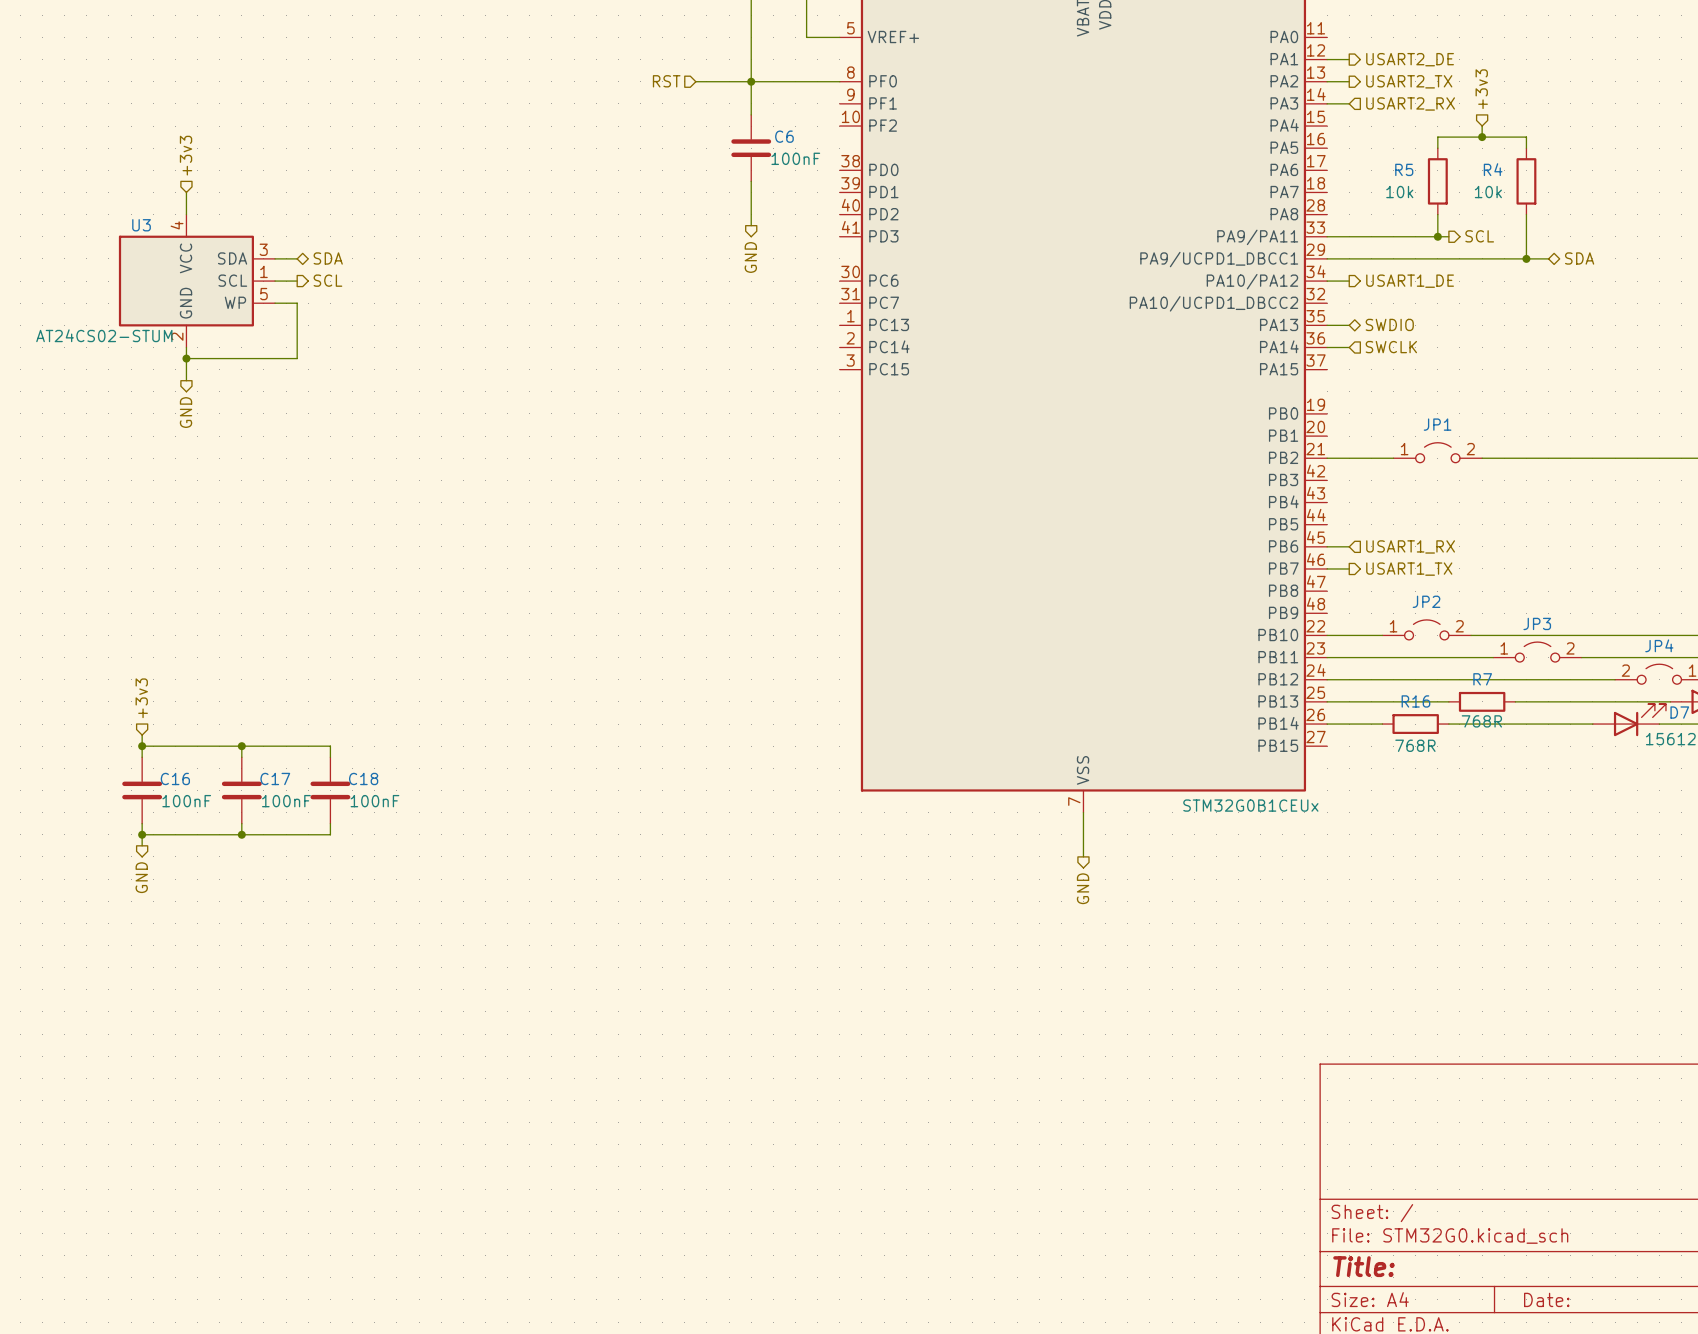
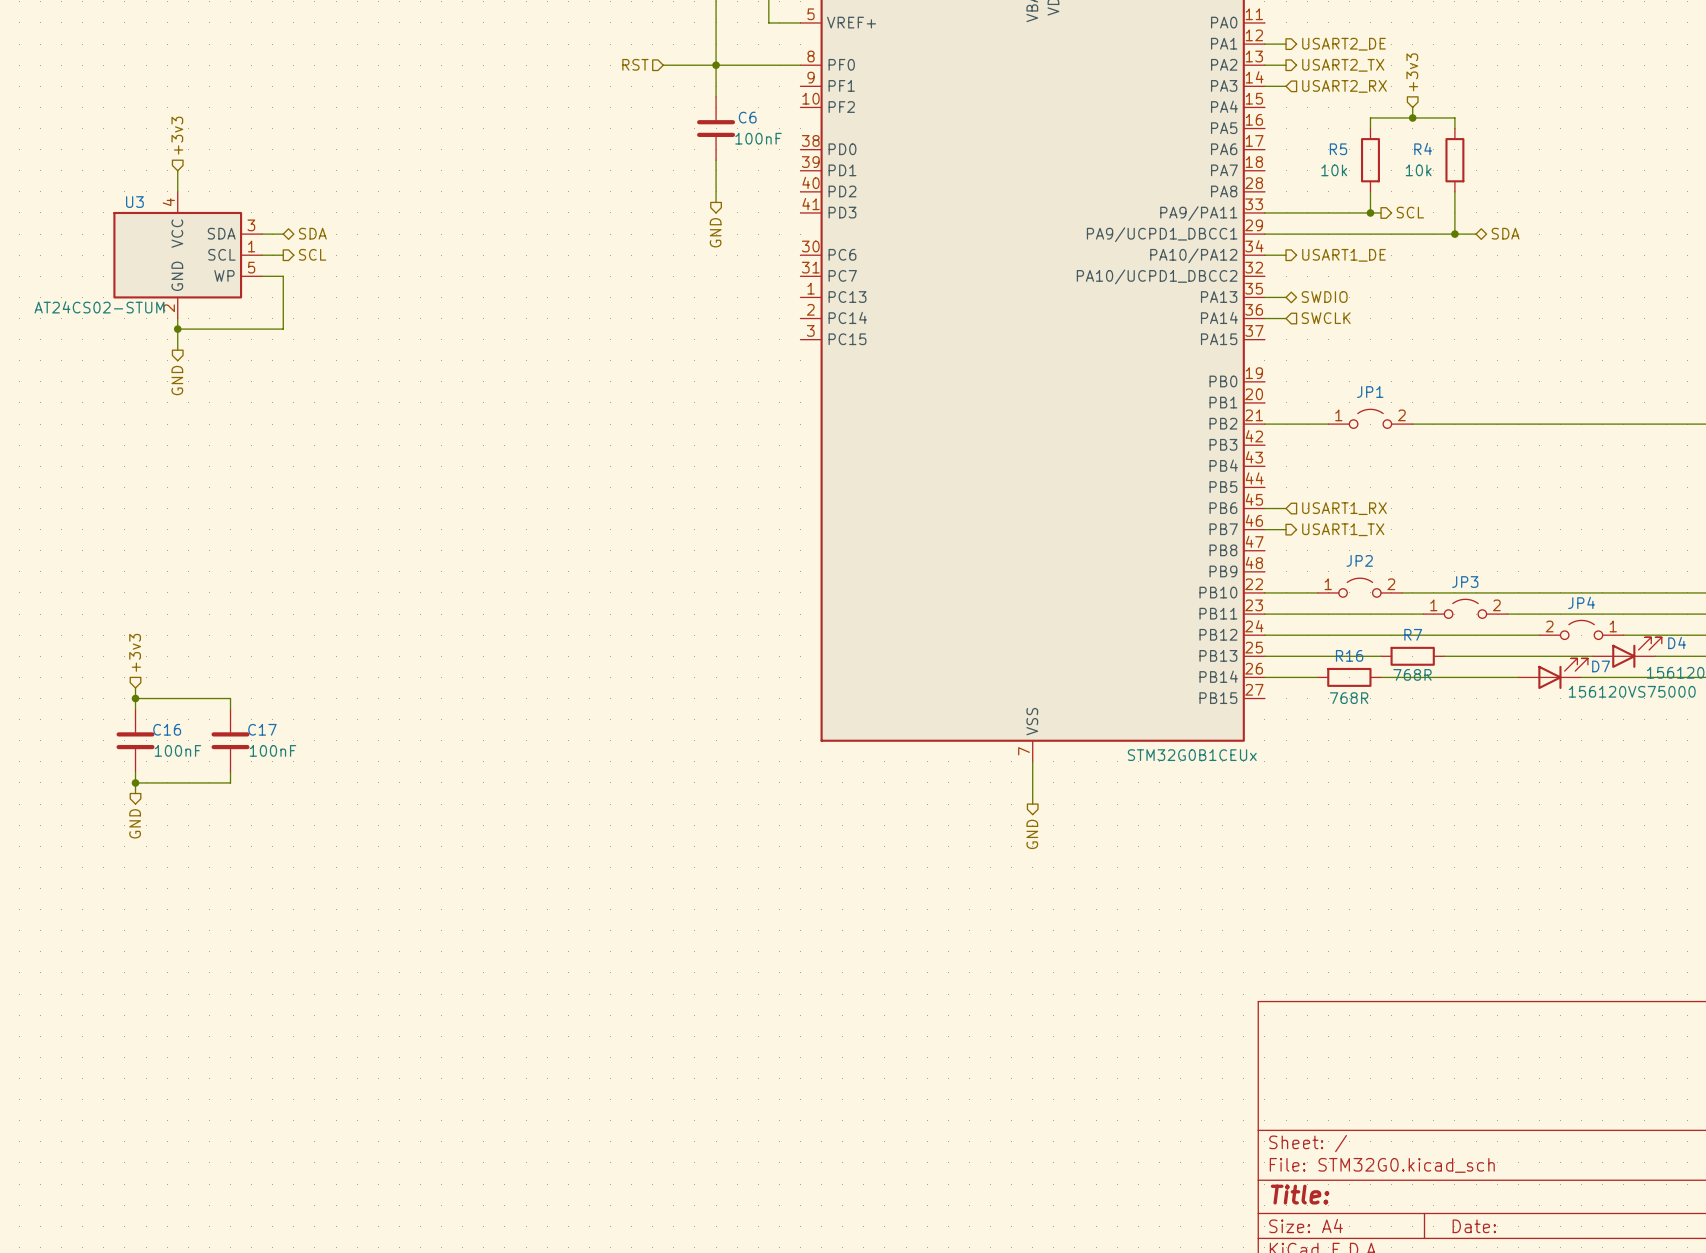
wire: (241, 746) (330, 746) (330, 757) -> none
junction: (241, 746) -> none
C18: 100nF (330, 790) -> none
wire: (330, 823) (330, 834) (241, 834) -> none
junction: (241, 834) -> none

